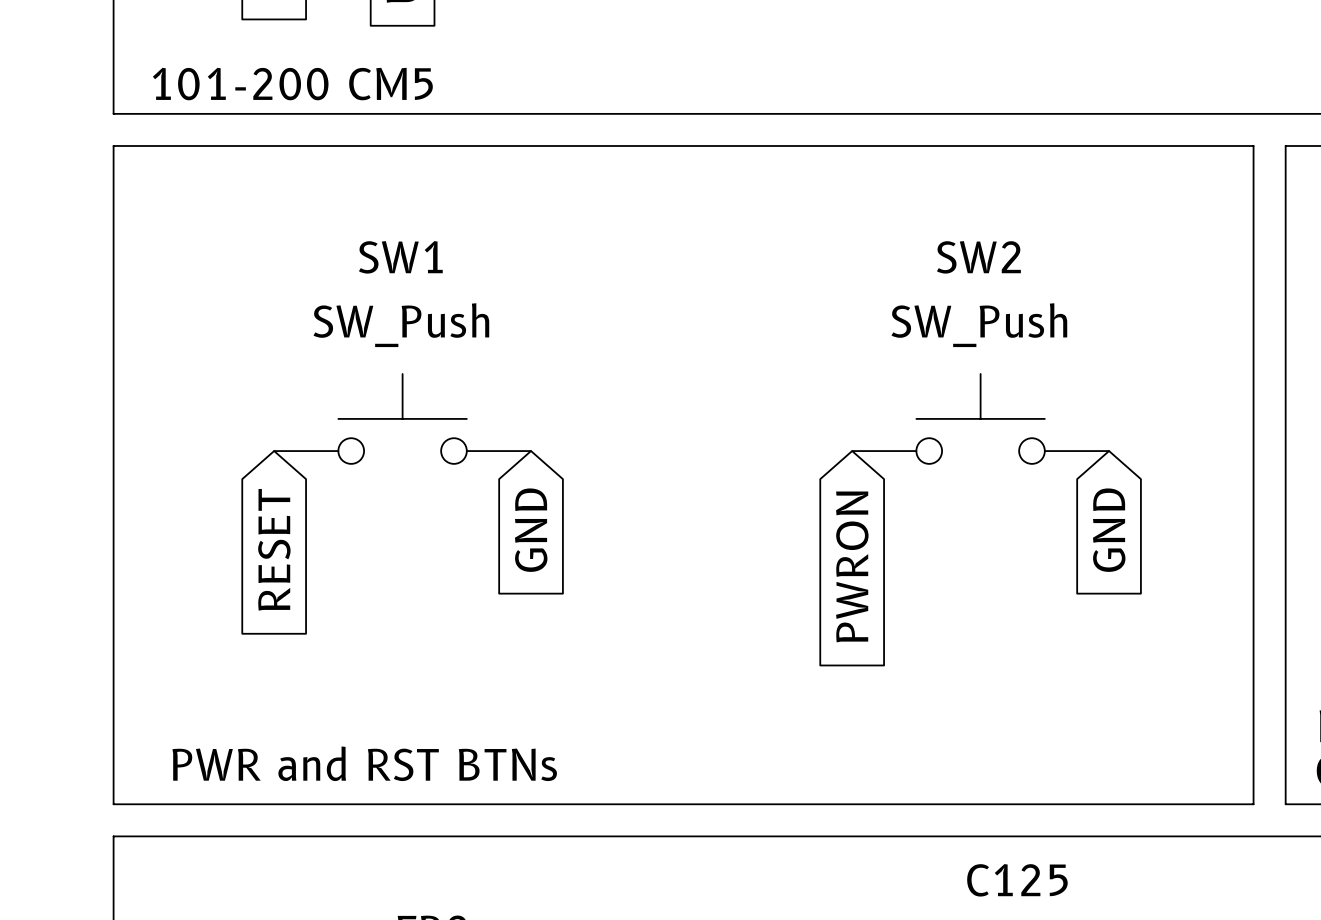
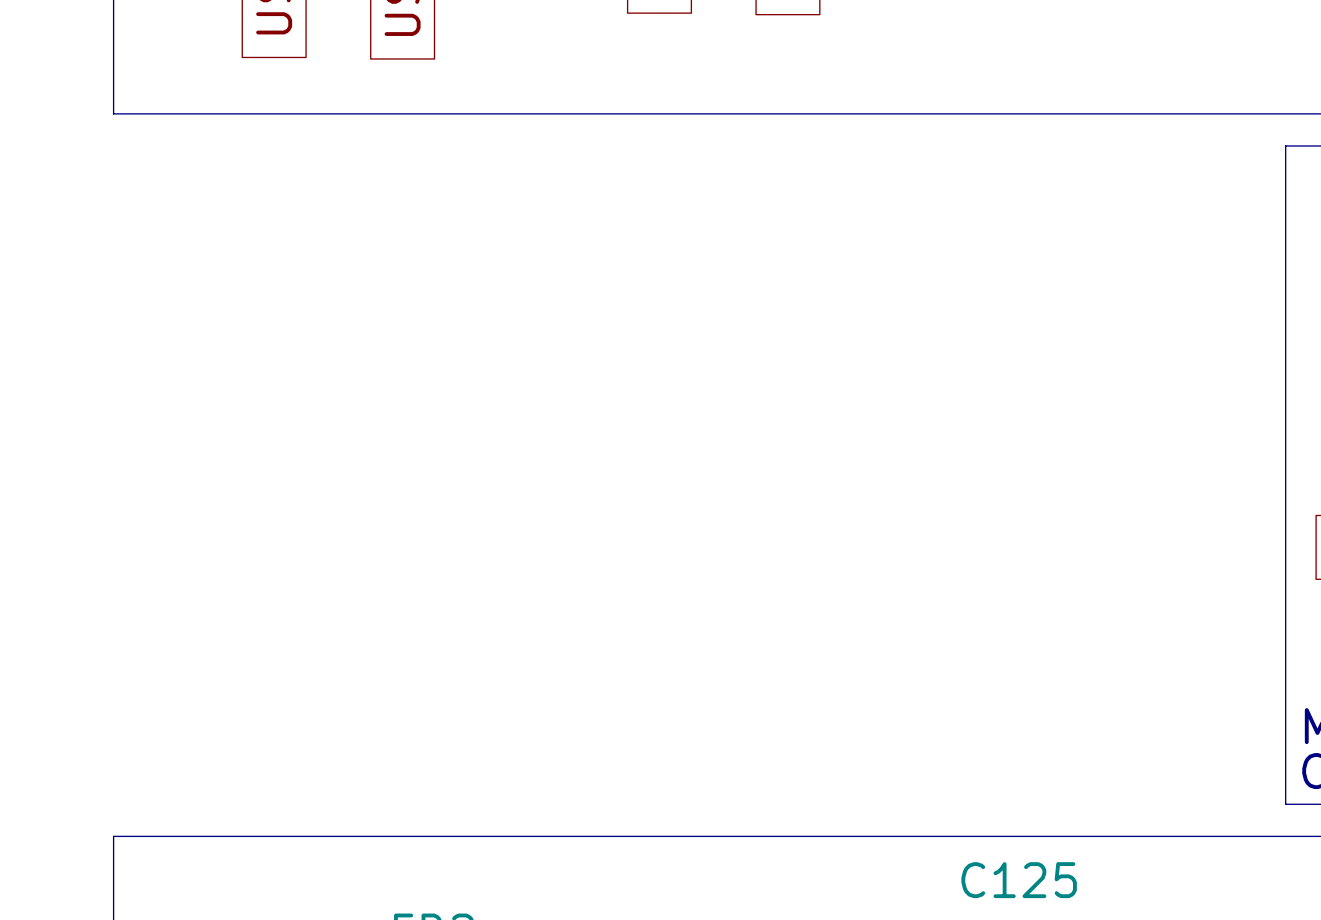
text: 101-200 CM5 (292, 84) -> none
line: (113, 145) (113, 804) (1253, 804) (1253, 145) (113, 145) -> none
SW1: SW_Push (402, 418) -> none
SW2: SW_Push (980, 418) -> none
global label: GND (531, 530) -> none
global label: GND (1109, 530) -> none
global label: RESET (274, 549) -> none
global label: PWRON (852, 566) -> none
text: PWR and RST BTNs (364, 763) -> none

